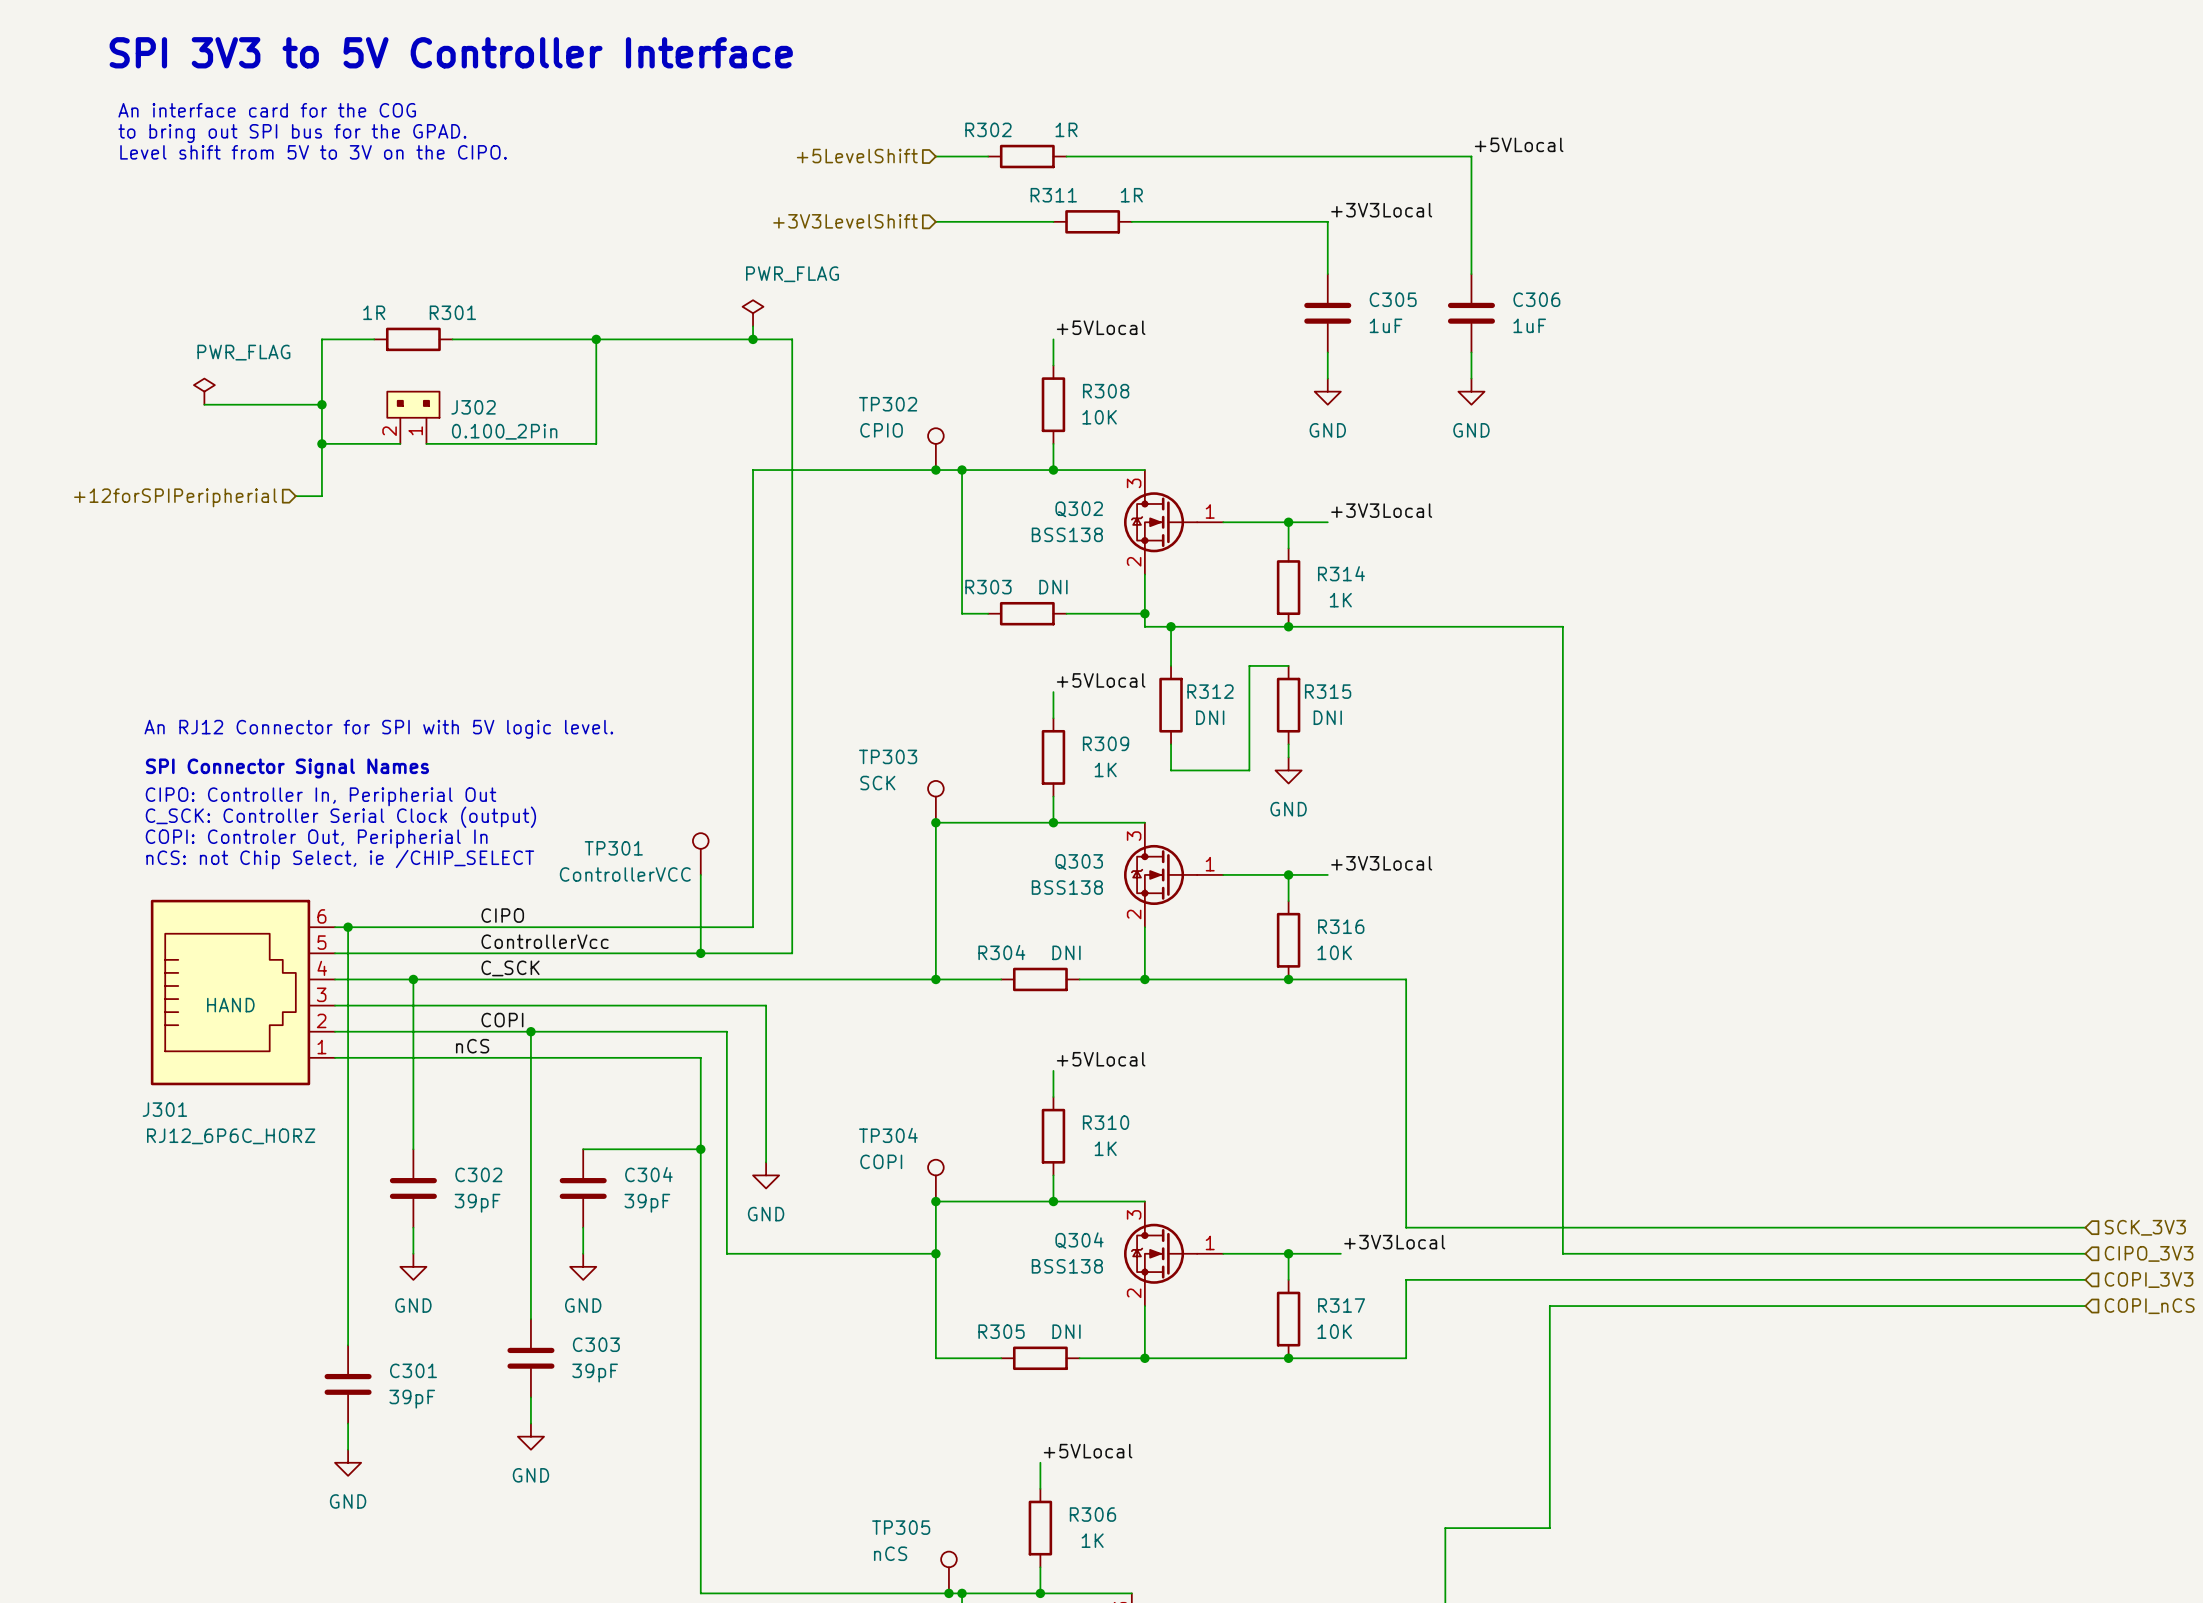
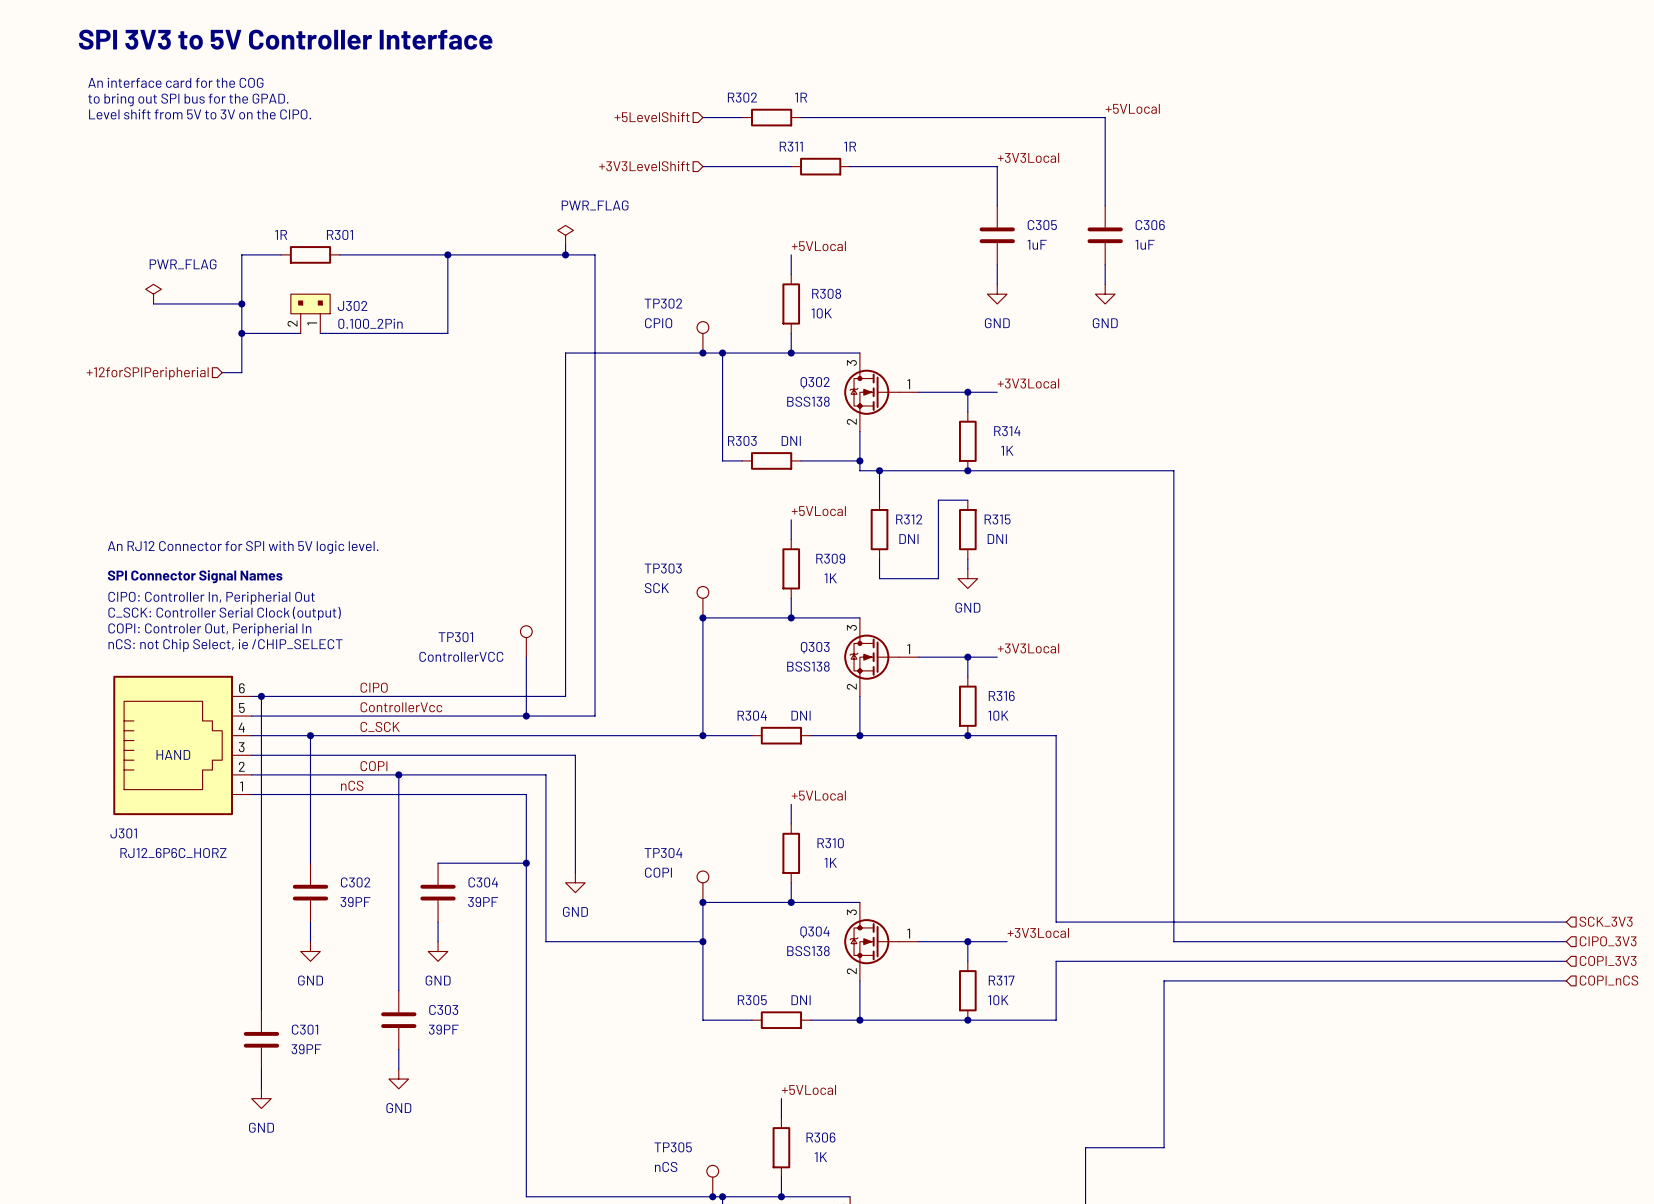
C302 value: 39pF (477, 1203) -> 39PF (355, 902)
C304 value: 39pF (647, 1203) -> 39PF (483, 902)
C303 value: 39pF (595, 1373) -> 39PF (443, 1029)
C301 value: 39pF (412, 1399) -> 39PF (306, 1049)

